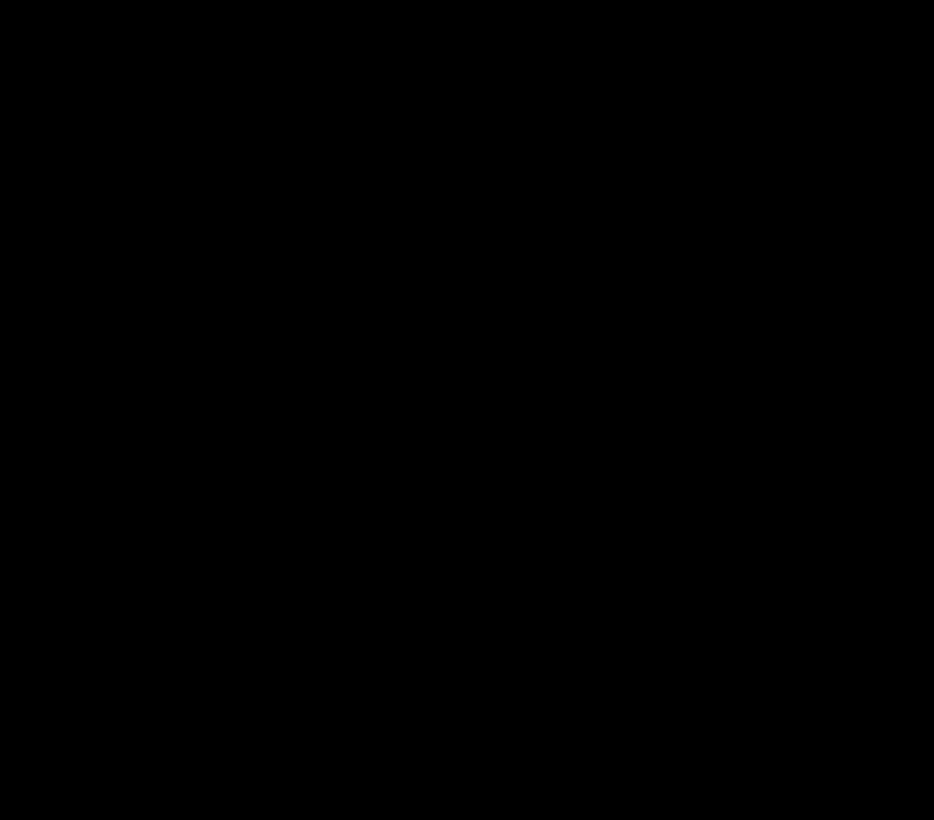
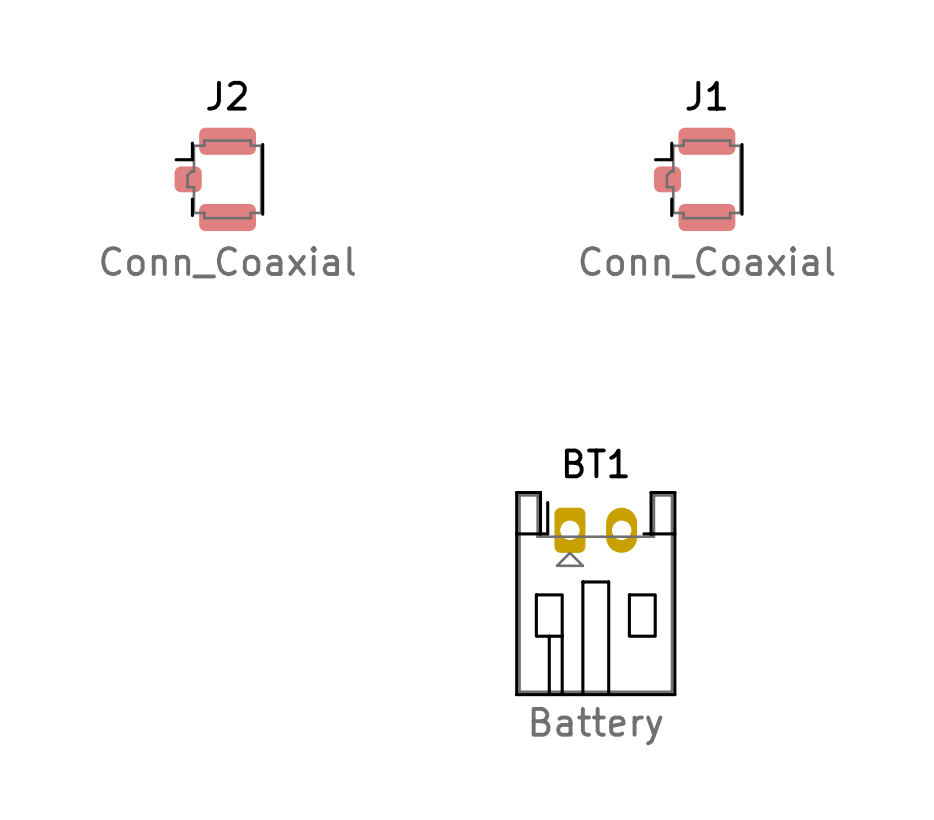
J2: none -> Conn_Coaxial (219, 179)
J1: none -> Conn_Coaxial (698, 179)
BT1: none -> Battery (595, 593)

